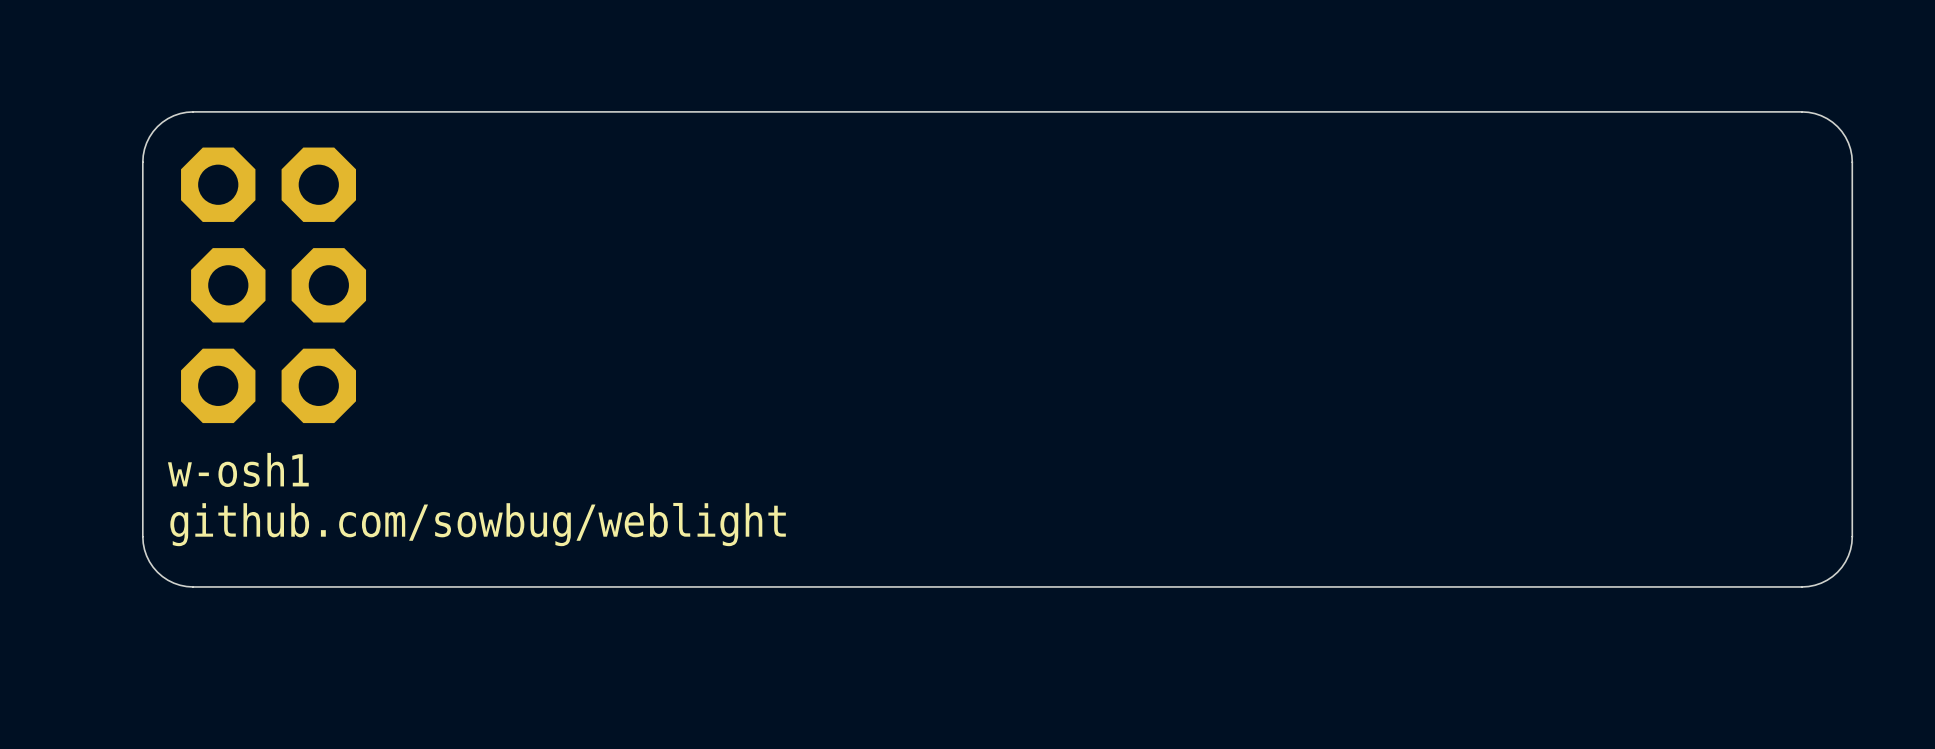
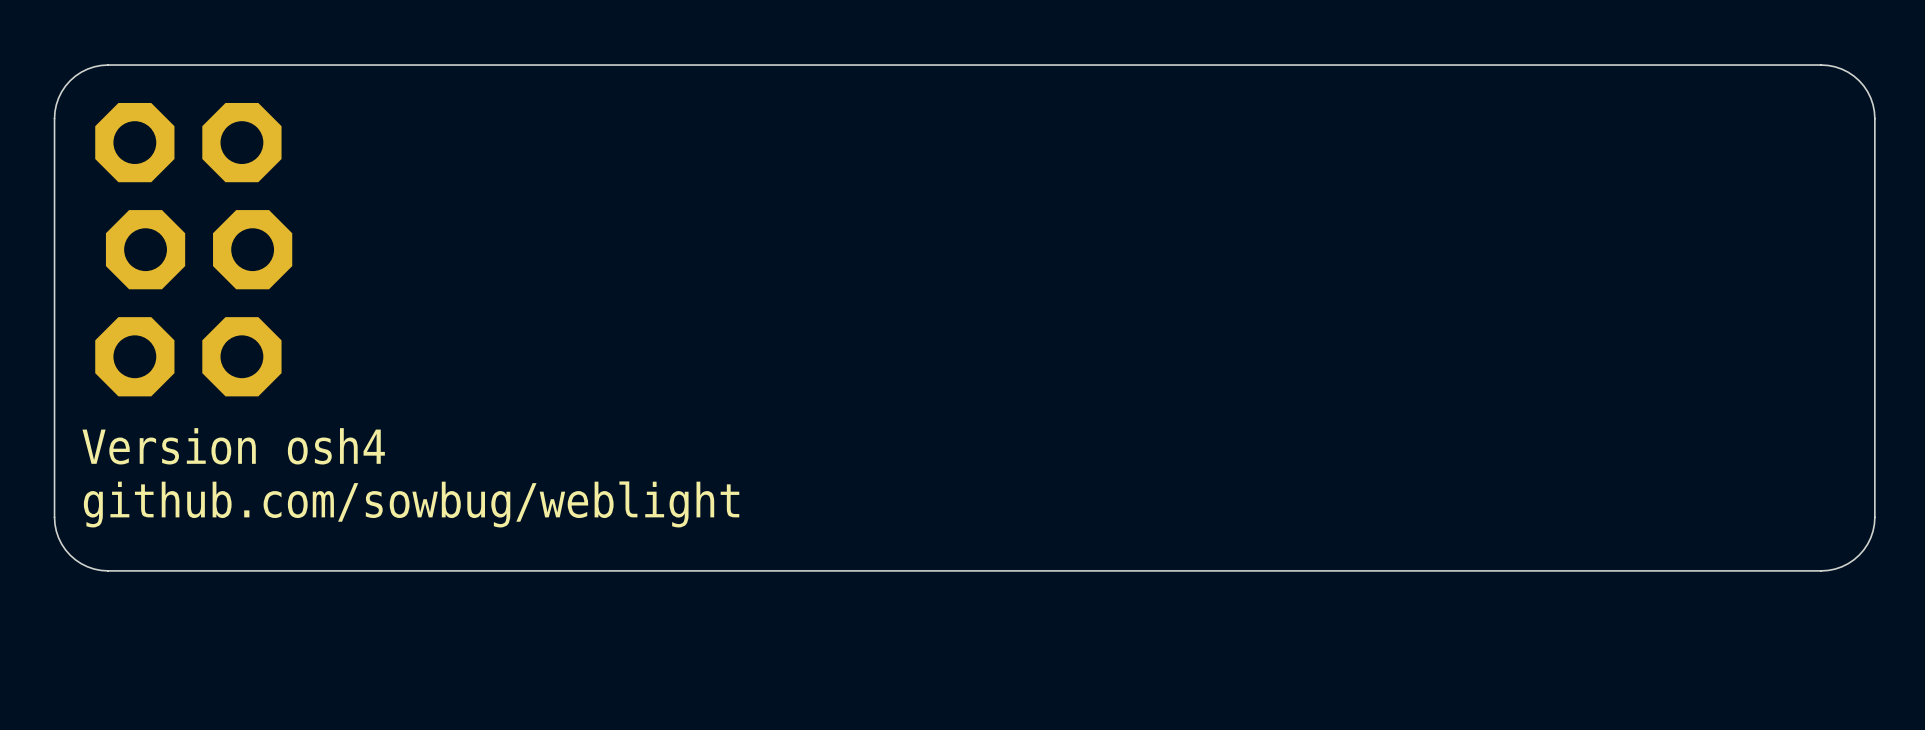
text: w-osh1 (238, 469) -> Version osh4 (233, 446)

